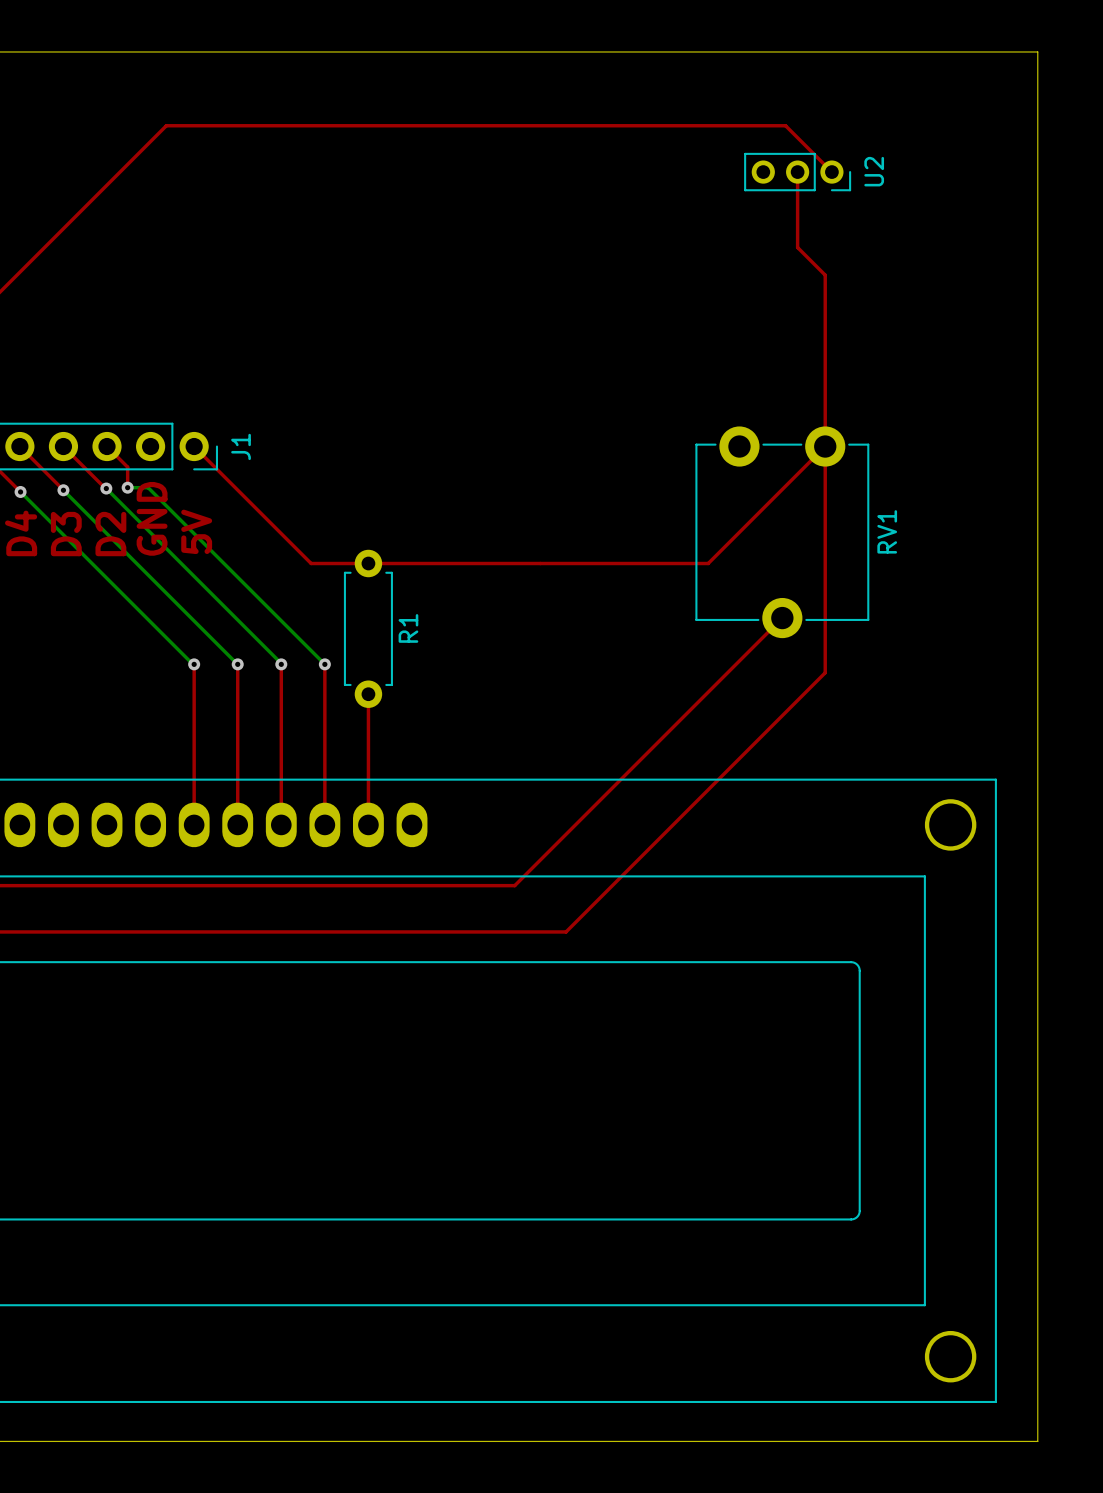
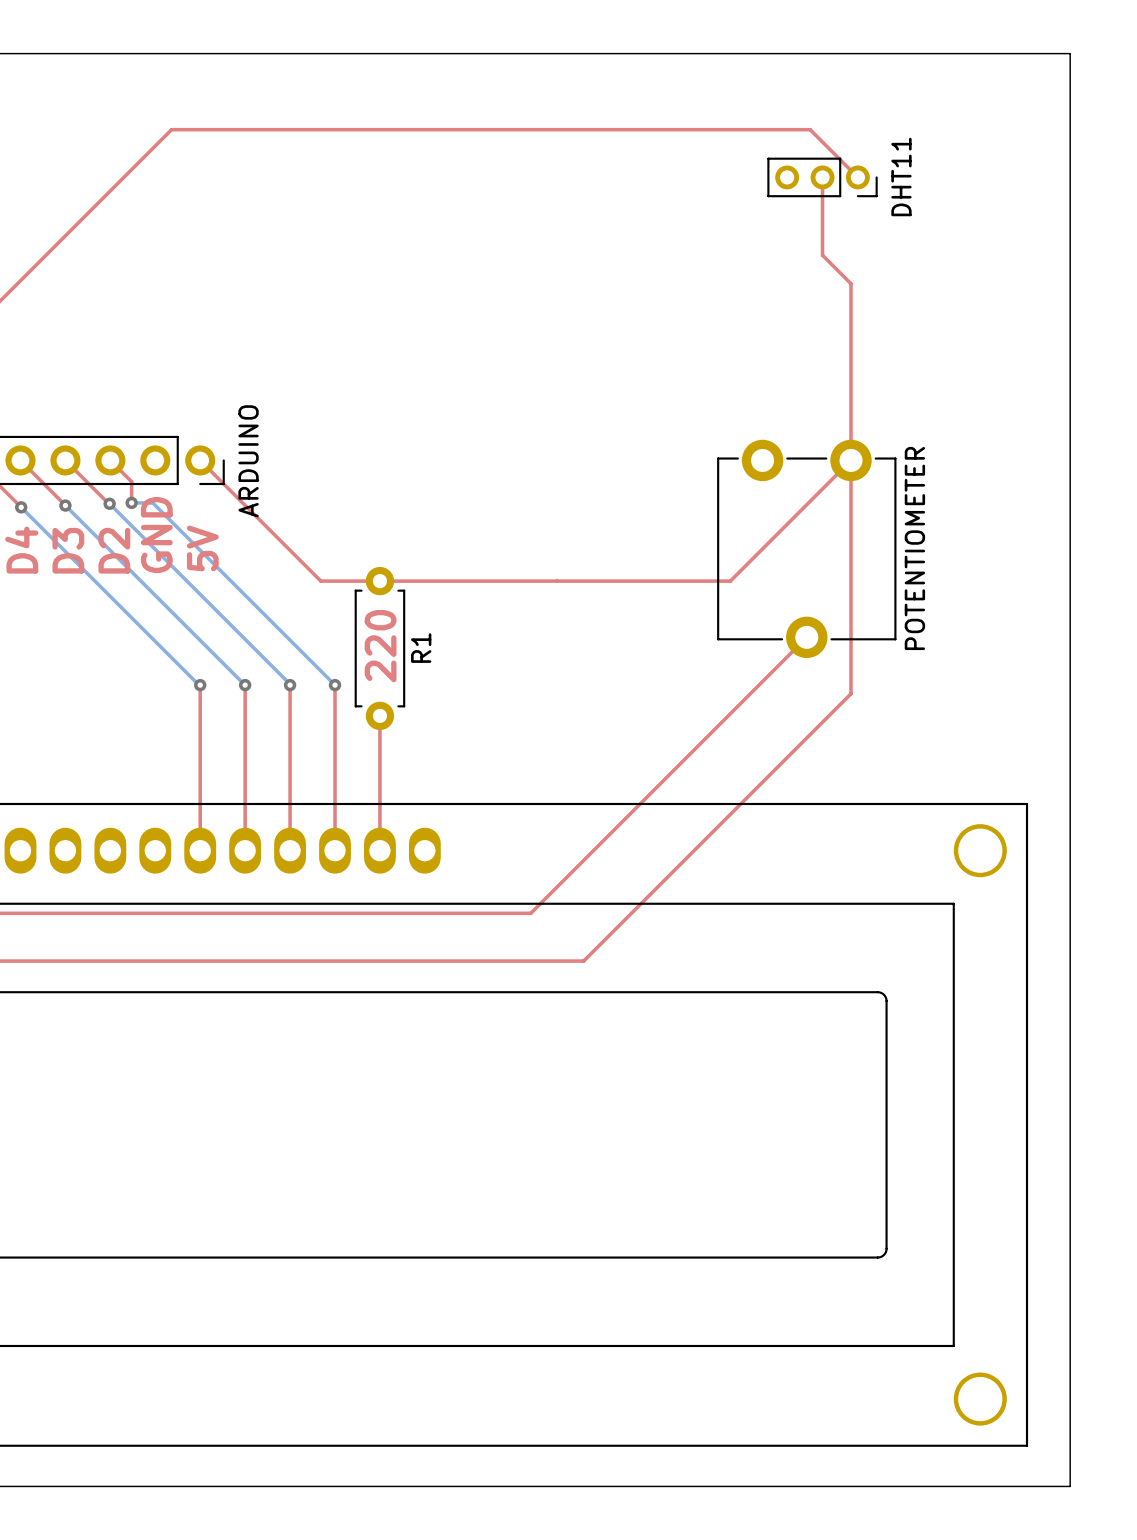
U2 name: U2 (874, 171) -> DHT11 (901, 177)
J1 name: J1 (241, 446) -> ARDUINO (248, 461)
RV1 name: RV1 (887, 531) -> POTENTIOMETER (914, 548)
text: none -> 220 (380, 646)

